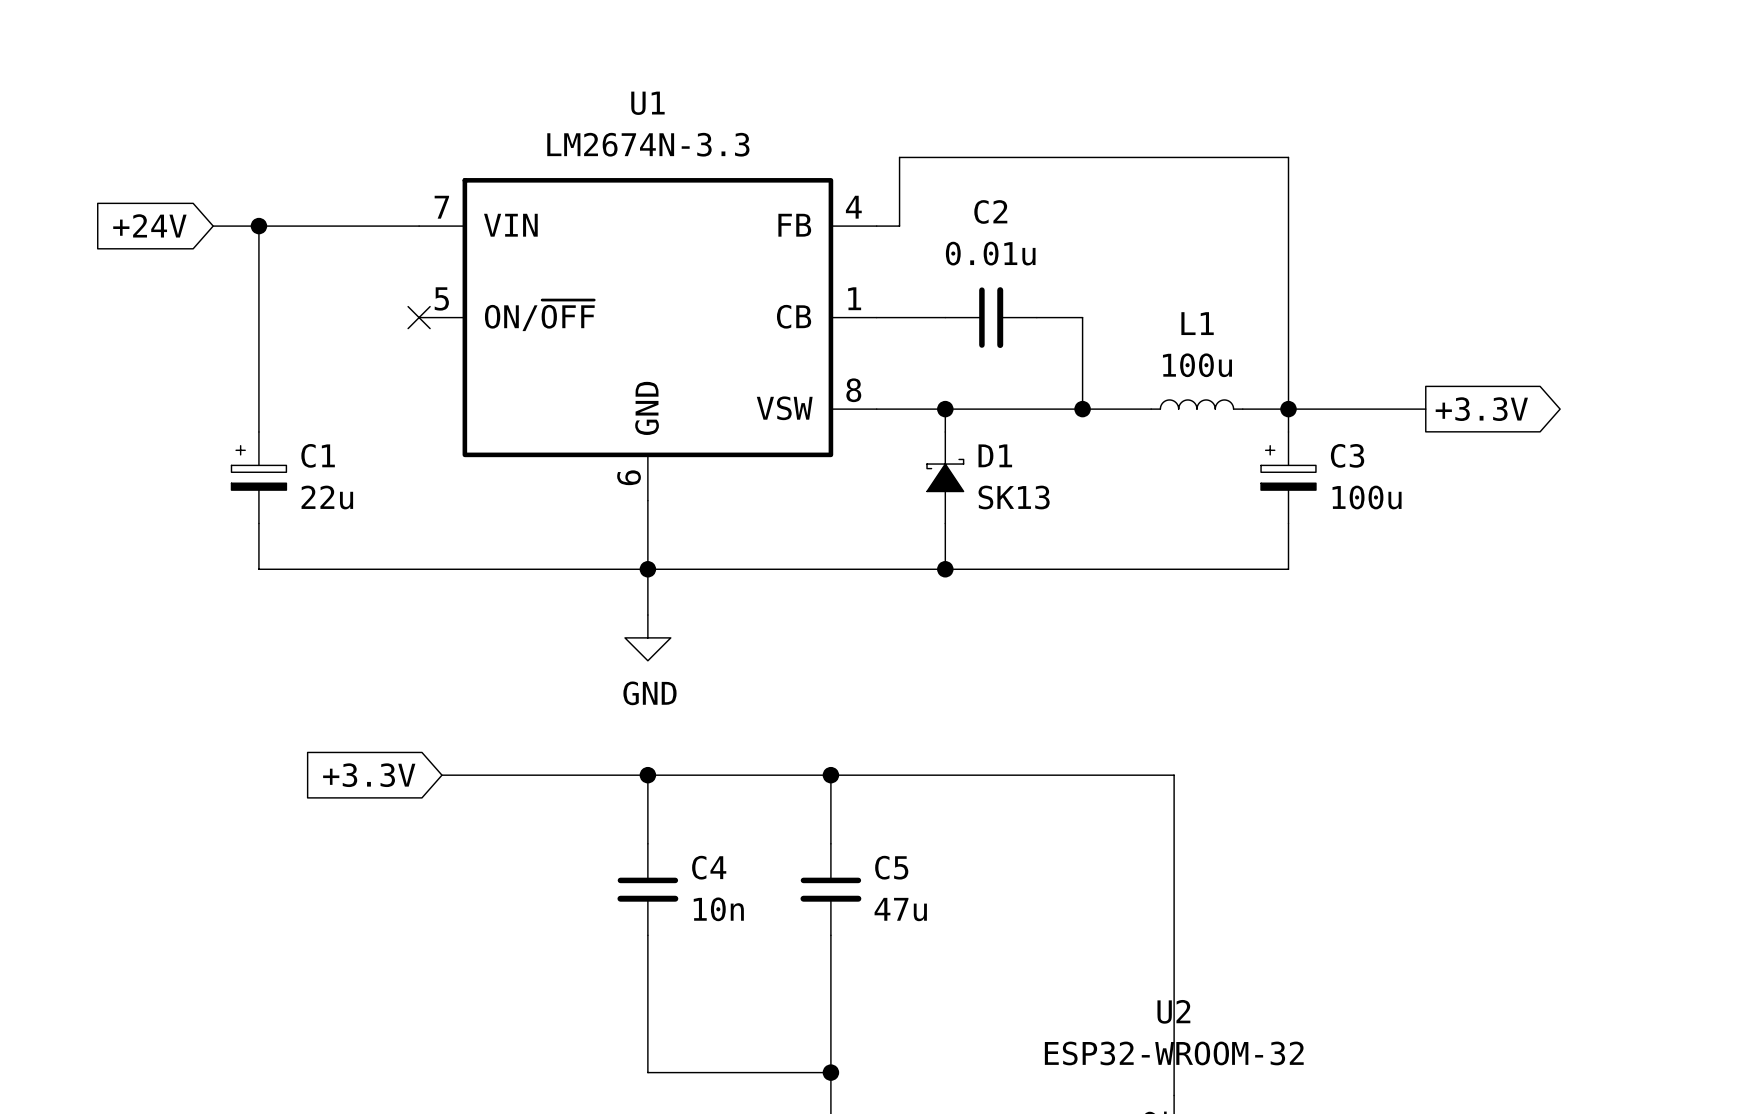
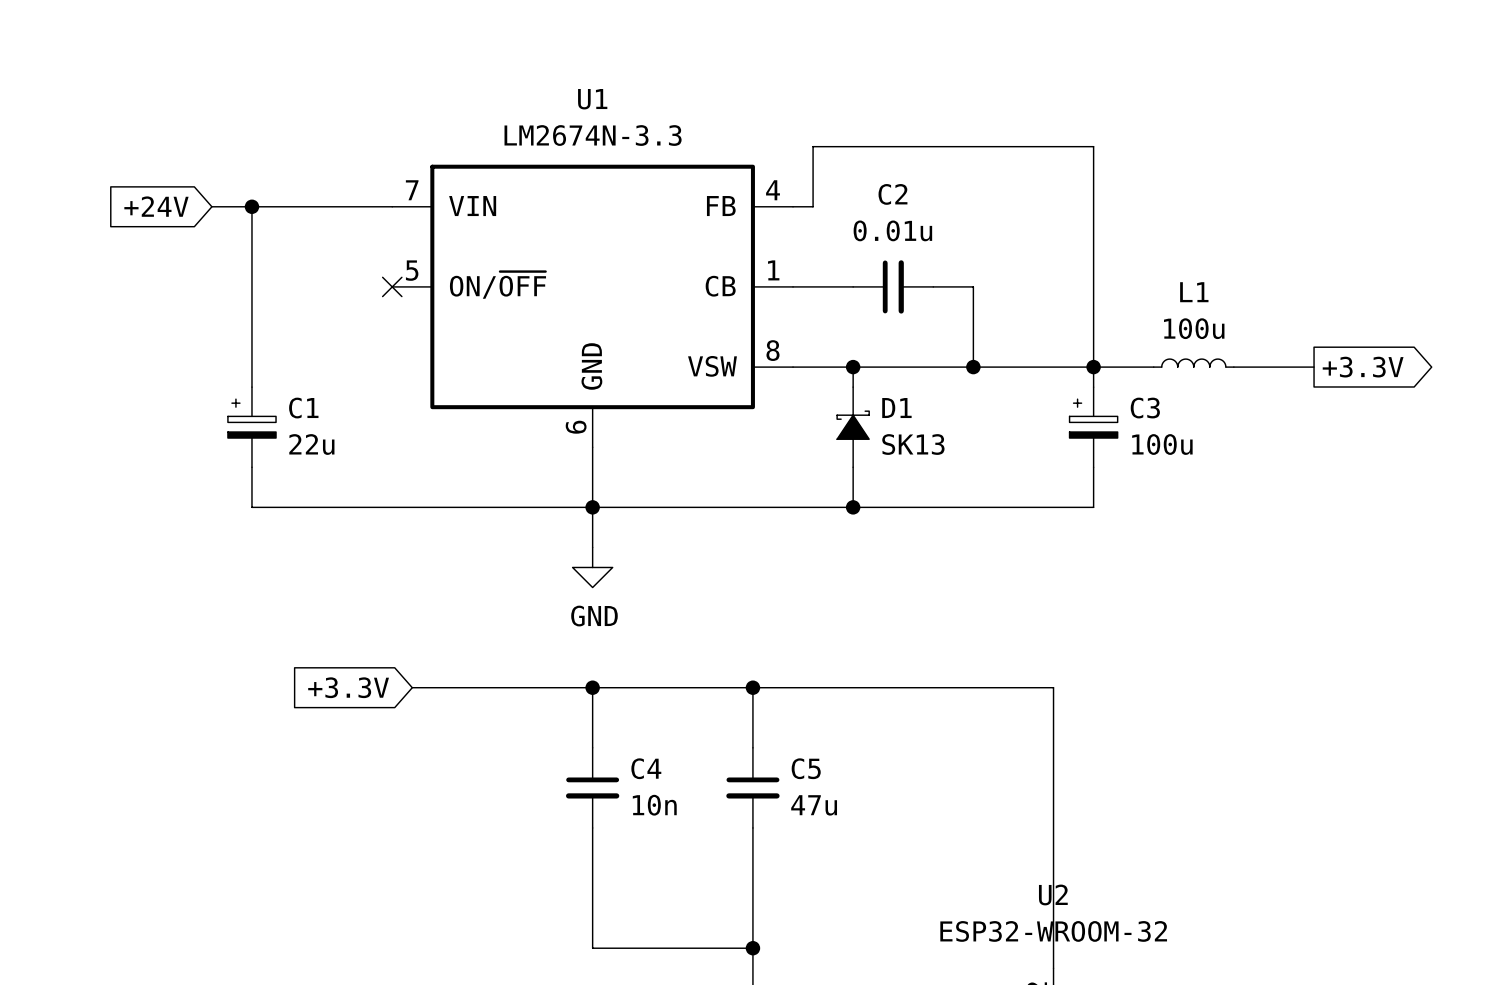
wire: (1219, 157) (1288, 157) (1288, 431) -> (1093, 146) (1093, 387)
L1 position: (1196, 404) -> (1193, 363)
wire: (1288, 409) (1380, 409) -> (1033, 367) (1113, 367)
junction position: (1288, 409) -> (1093, 367)
wire: none -> (1273, 367) (1314, 367)
global label position: +3.3V (1481, 409) -> +3.3V (1363, 367)
C3 position: (1288, 477) -> (1093, 427)
wire: (1288, 523) (1288, 569) (1219, 569) -> (1093, 467) (1093, 507)

